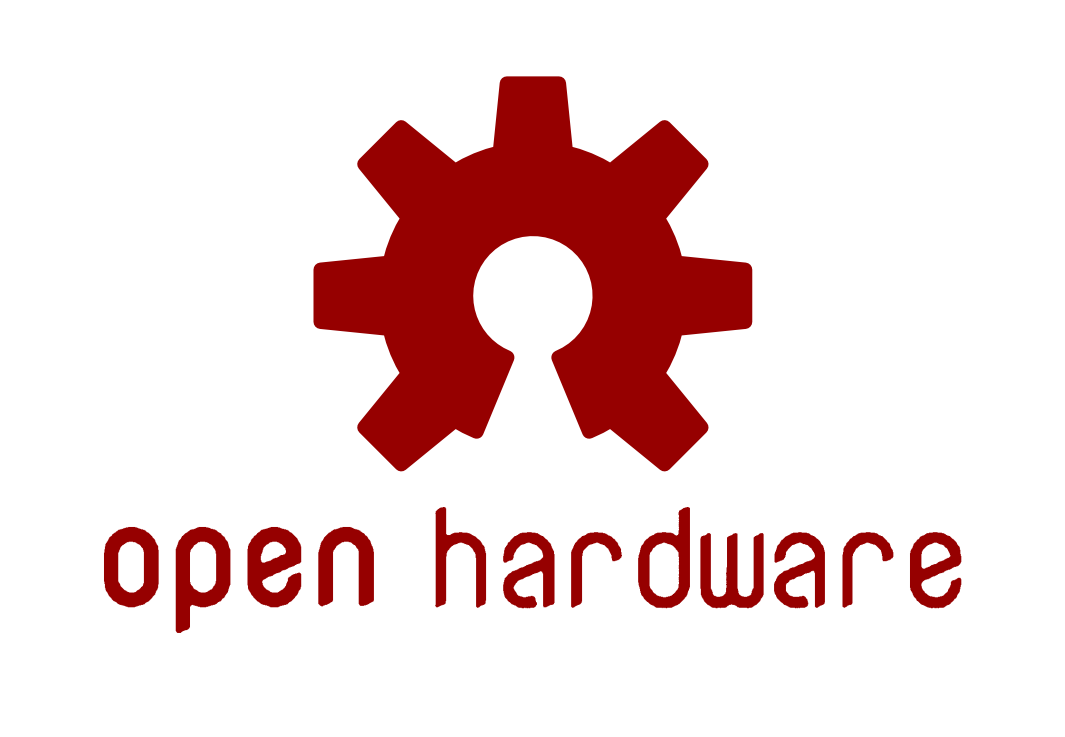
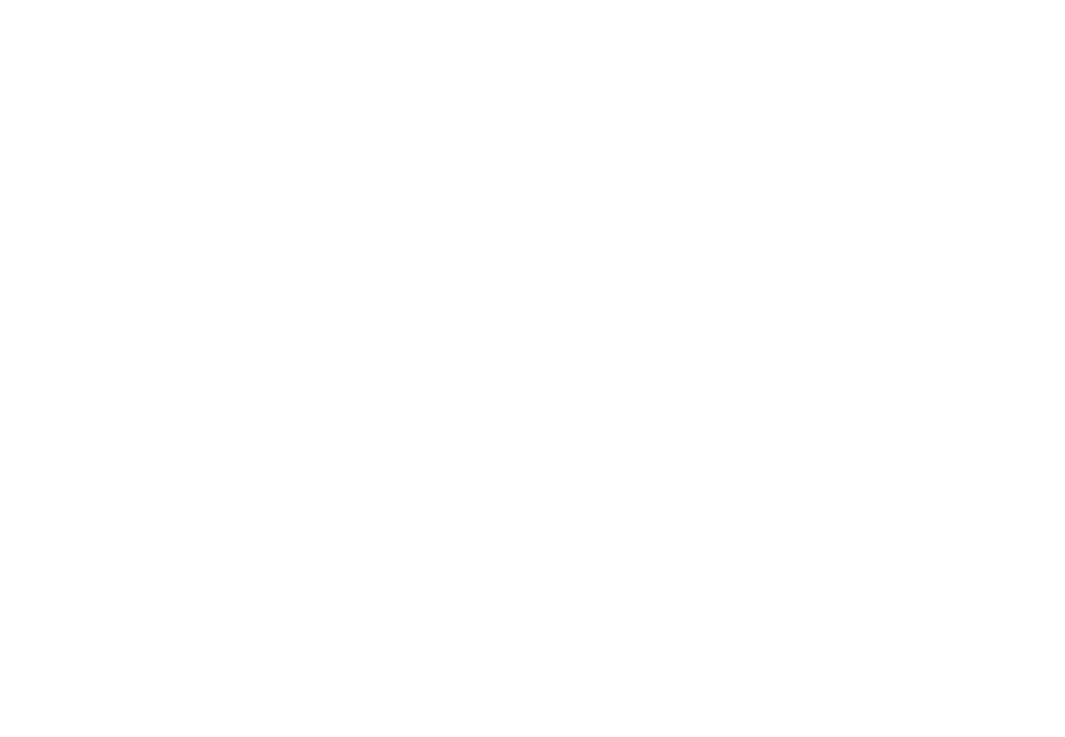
part: (532, 354) -> none

